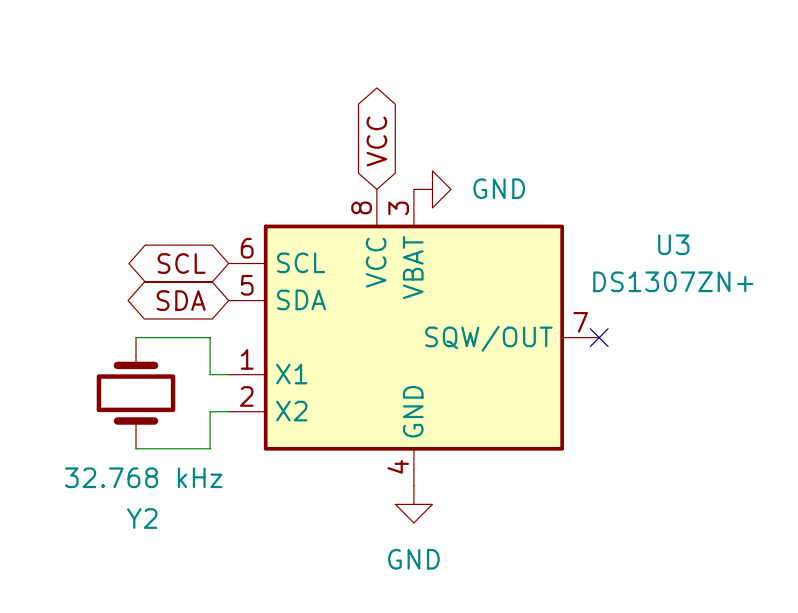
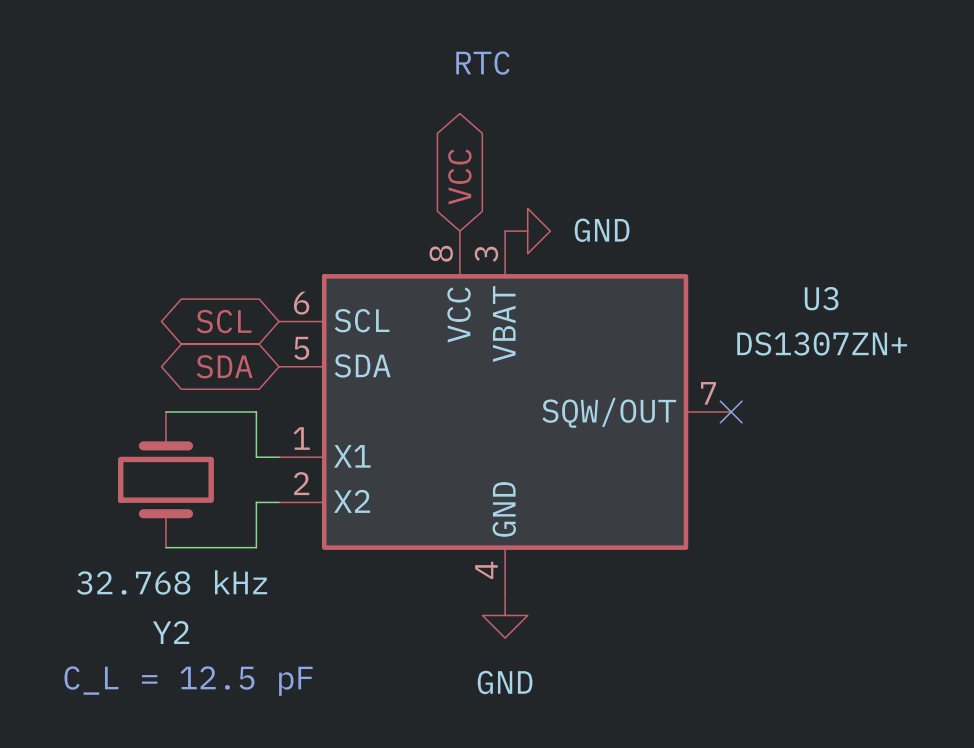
text: none -> RTC (482, 63)
text: none -> C_L = 12.5 pF (188, 681)

